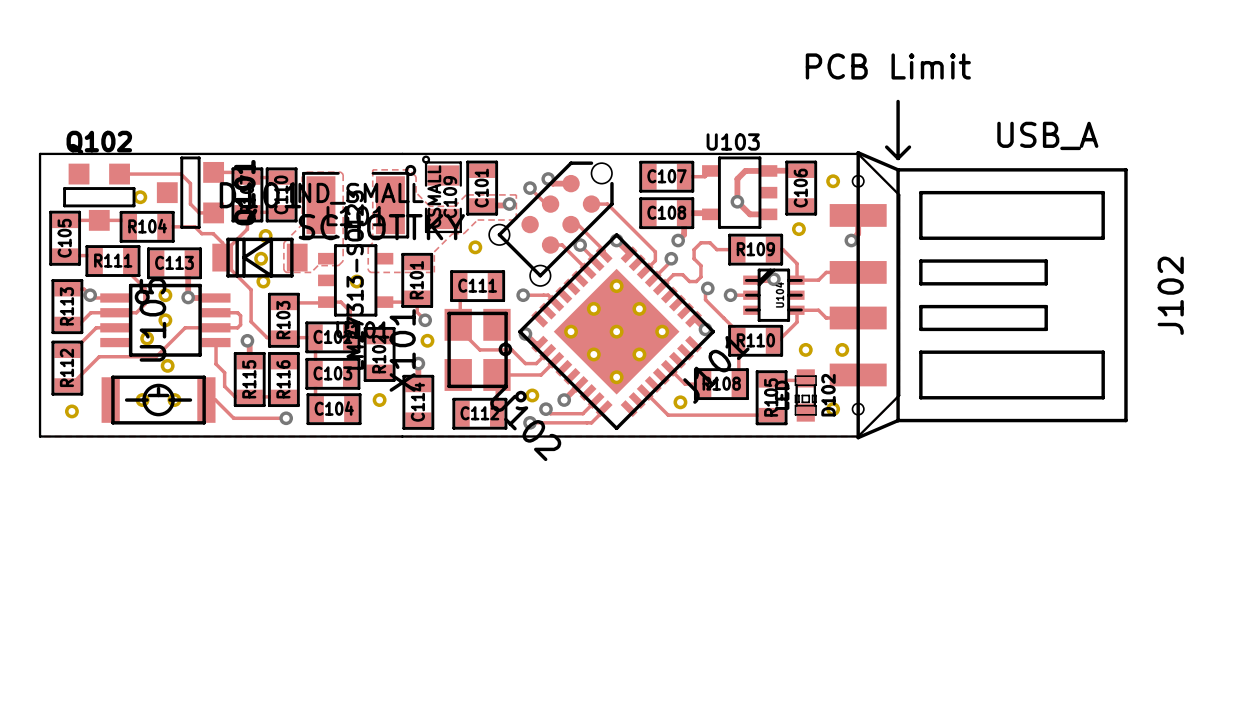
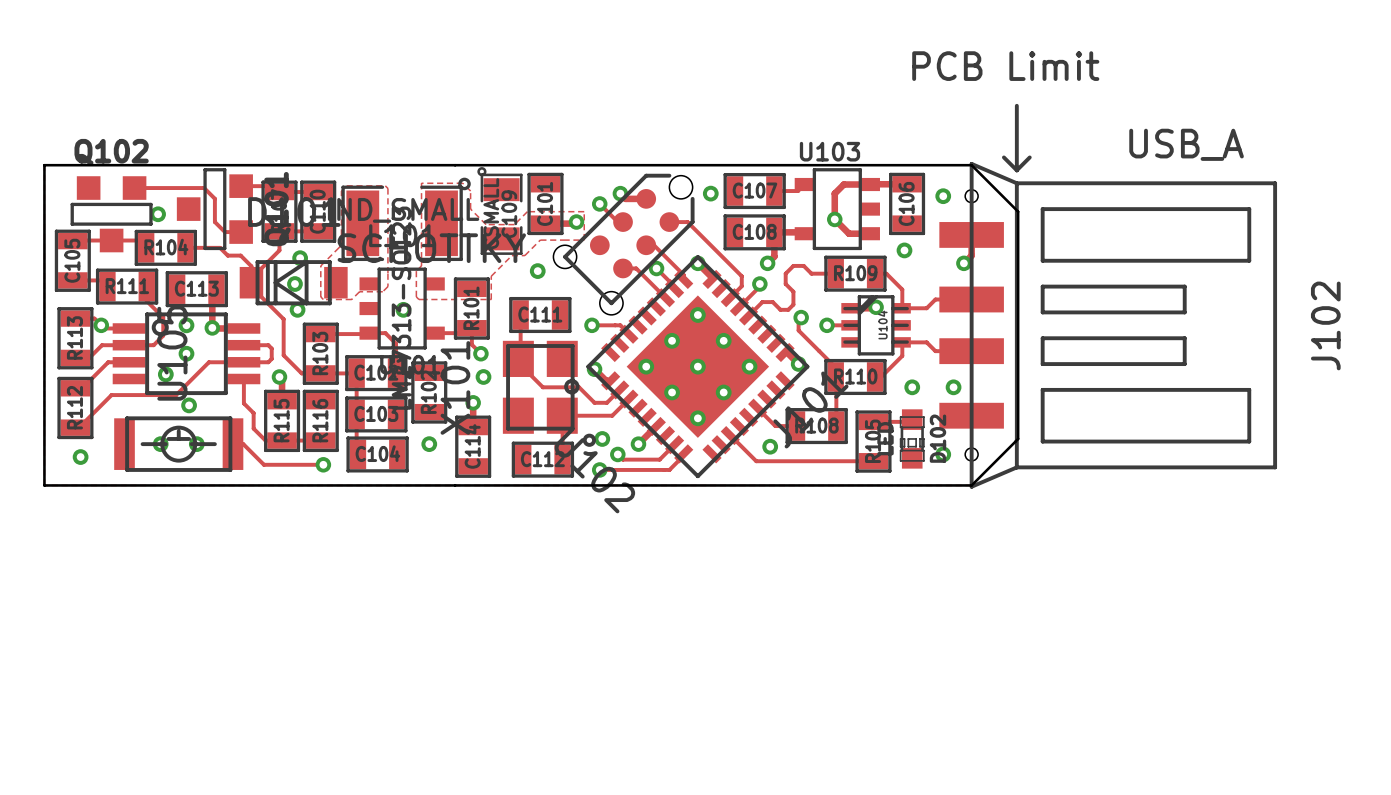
part: none -> (710, 193)

